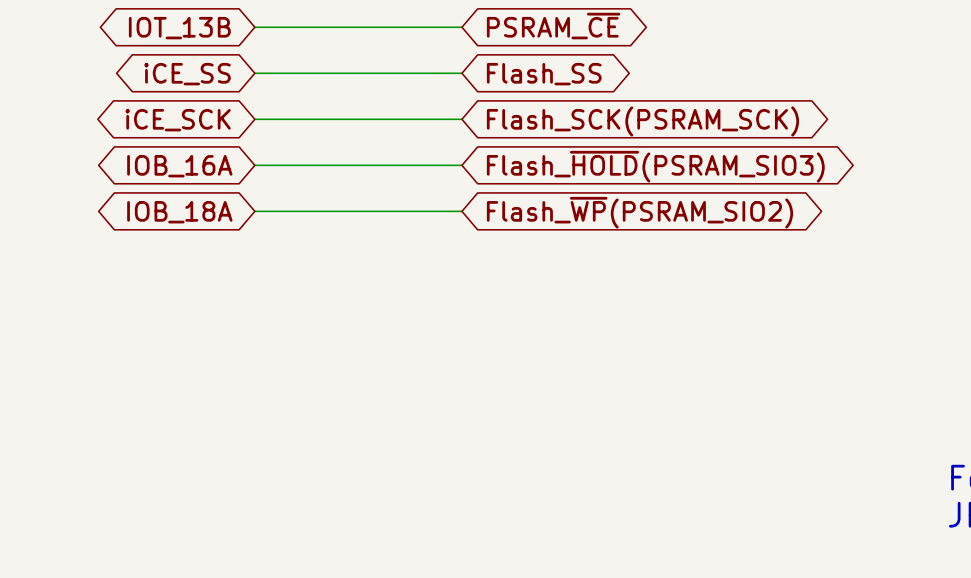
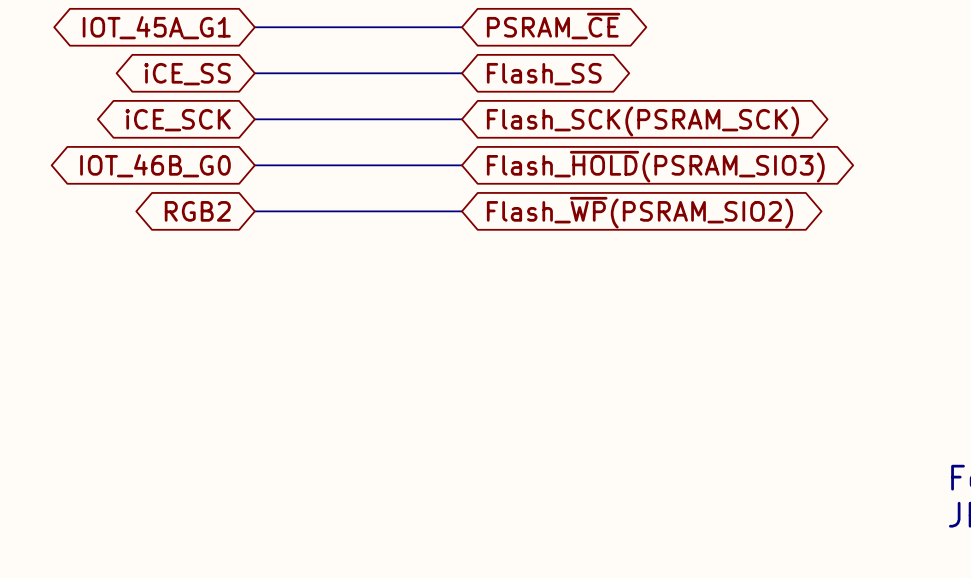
global label: IOT_13B (179, 28) -> IOT_45A_G1 (156, 27)
global label: IOB_16A (179, 166) -> IOT_46B_G0 (155, 165)
global label: IOB_18A (179, 212) -> RGB2 (197, 211)

